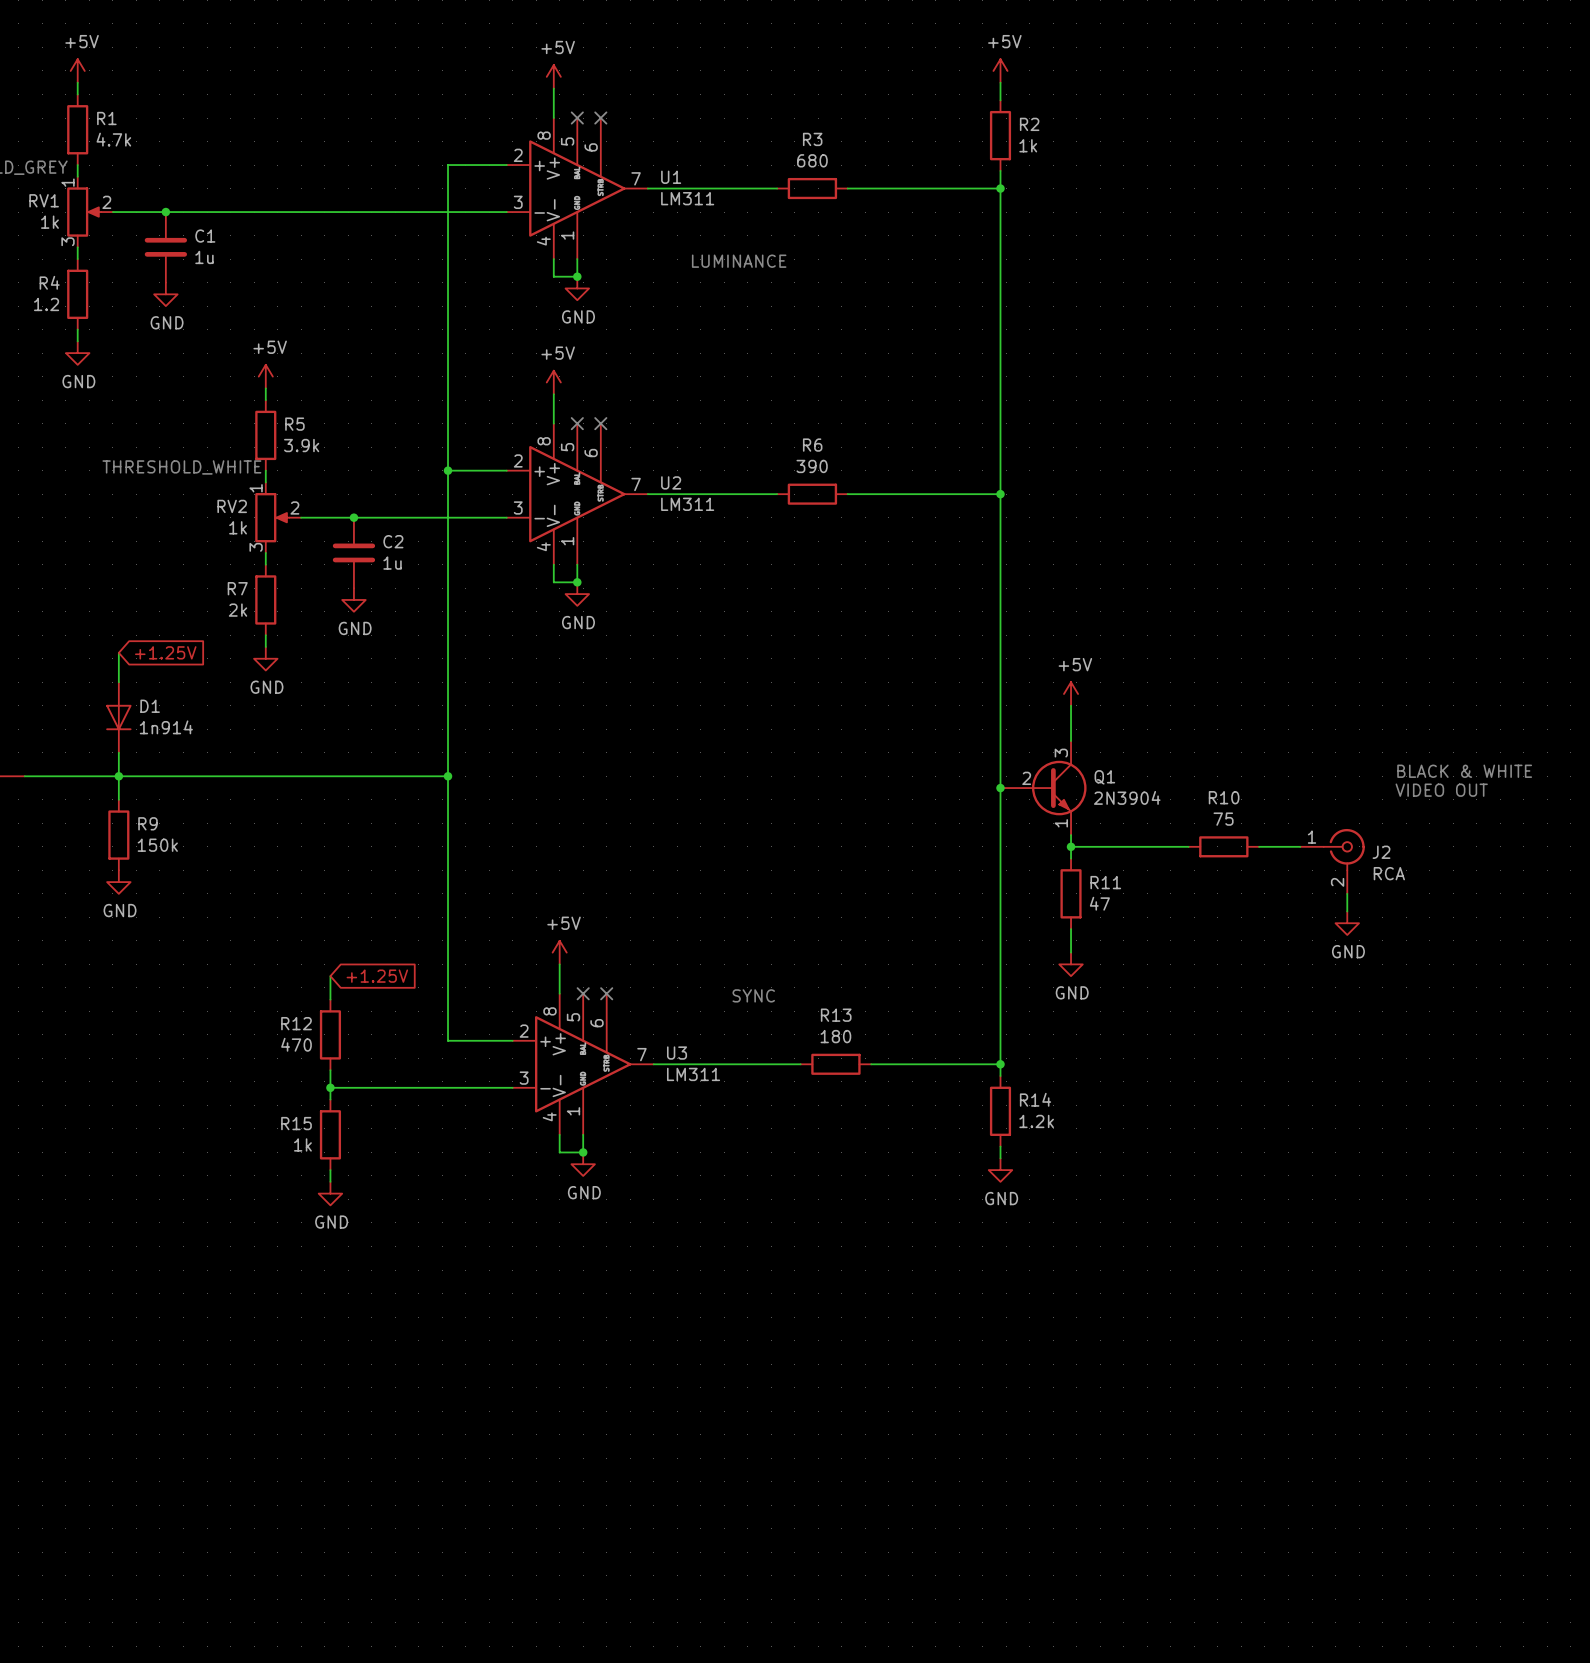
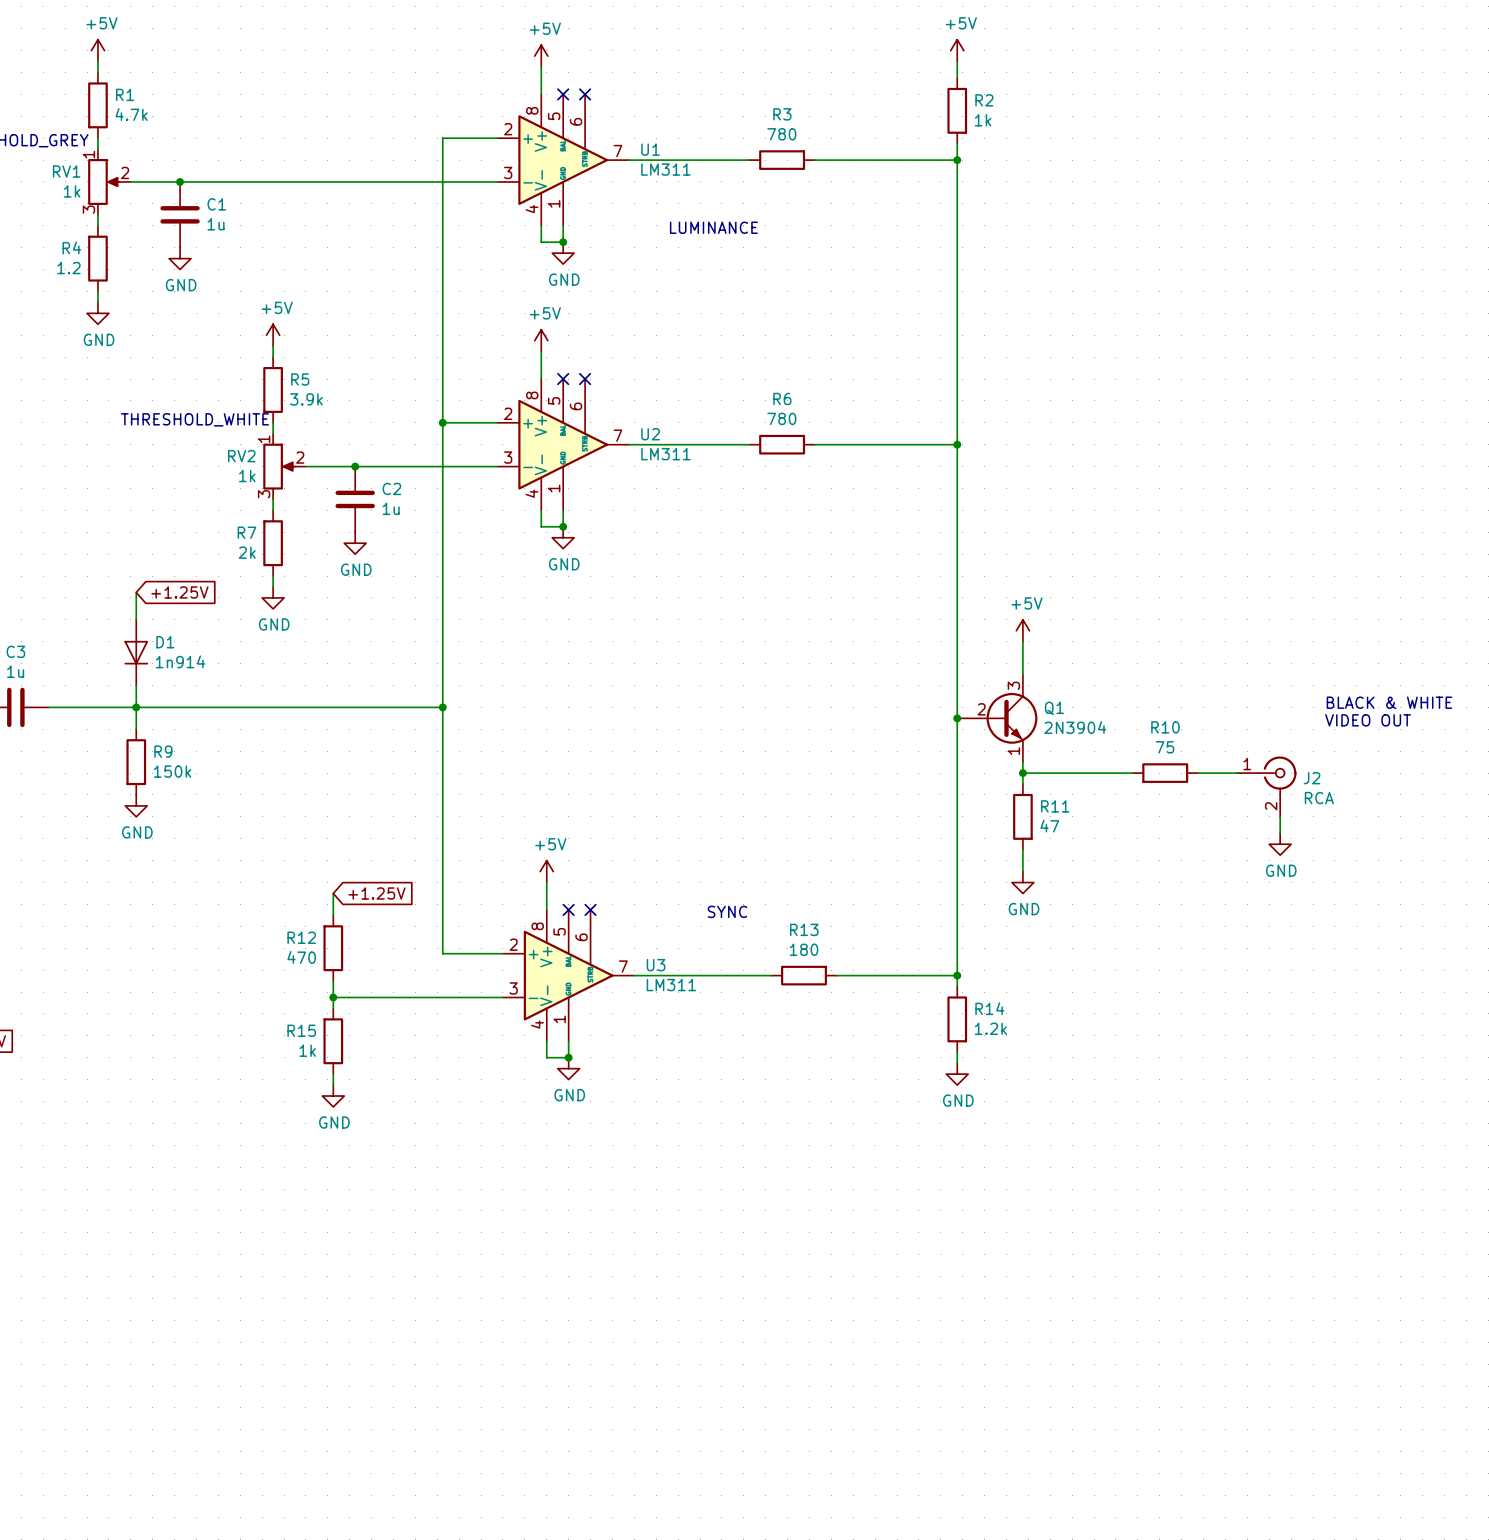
R3 value: 680 (812, 160) -> 780 (781, 134)
R6 value: 390 (812, 466) -> 780 (781, 418)

